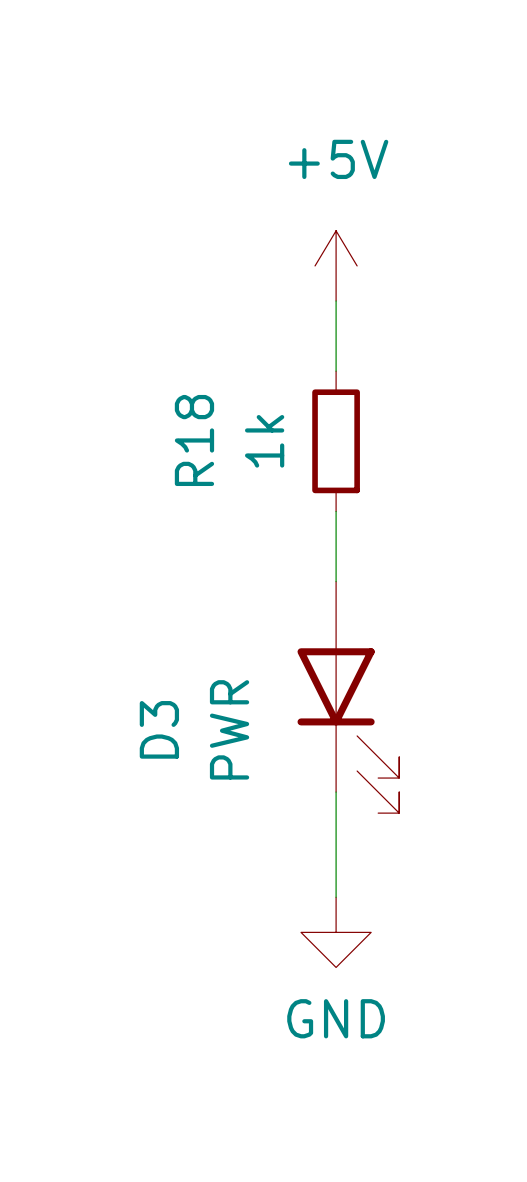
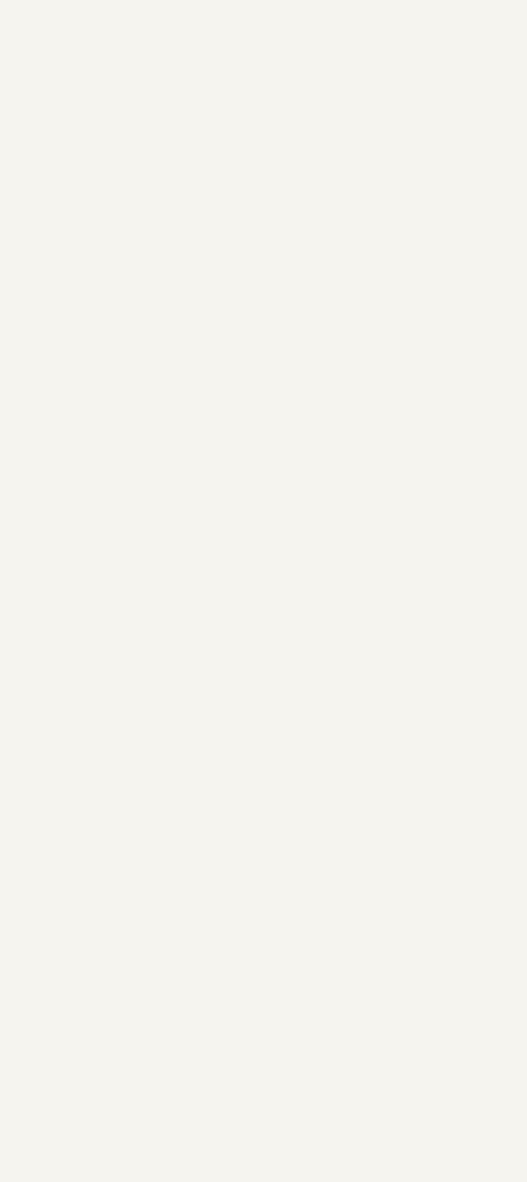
power symbol: +5V (336, 265) -> none
wire: (336, 301) (336, 371) -> none
R18: 1k (336, 441) -> none
wire: (336, 511) (336, 581) -> none
D3: PWR (348, 697) -> none
wire: (336, 792) (336, 897) -> none
power symbol: GND (336, 932) -> none

